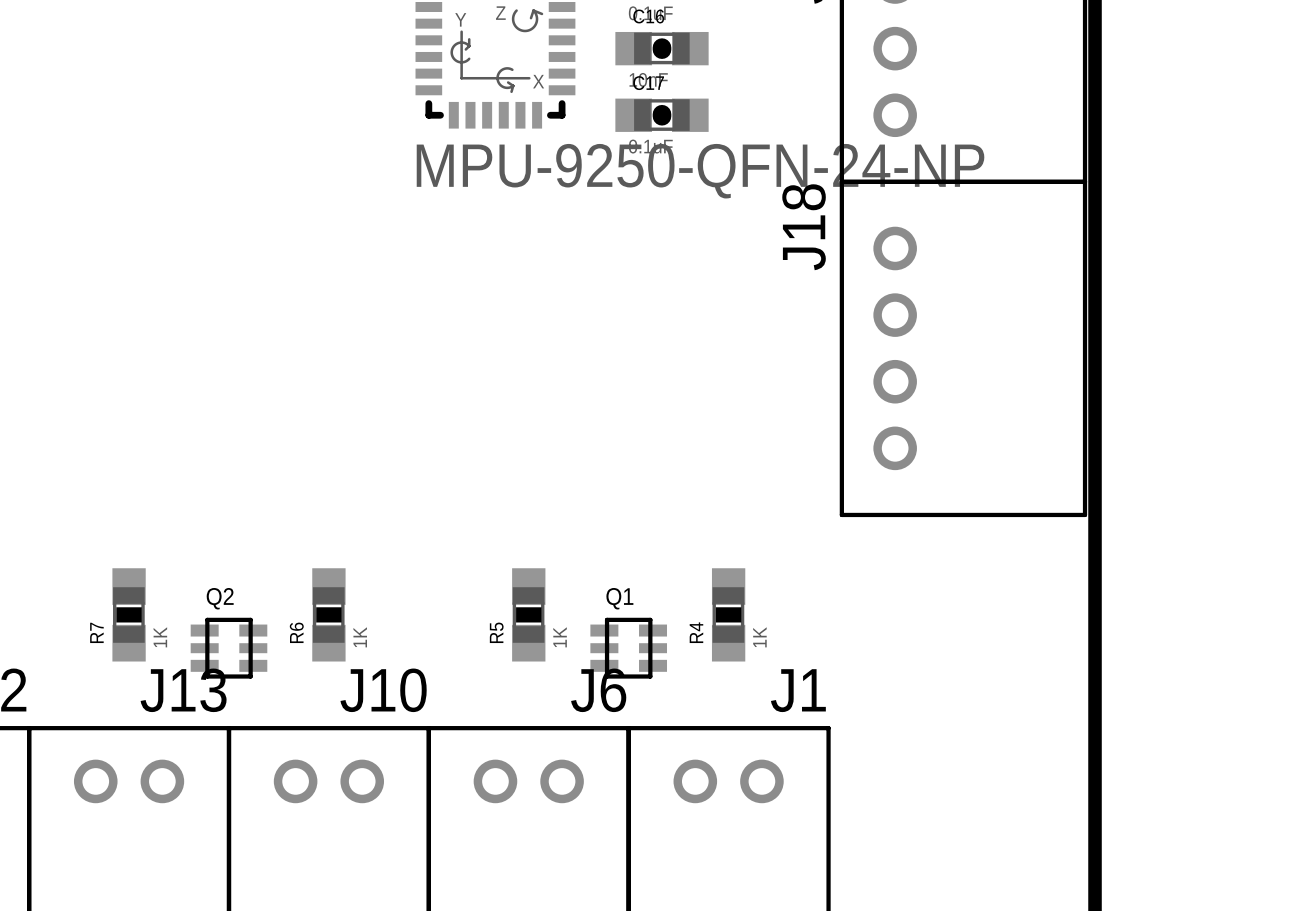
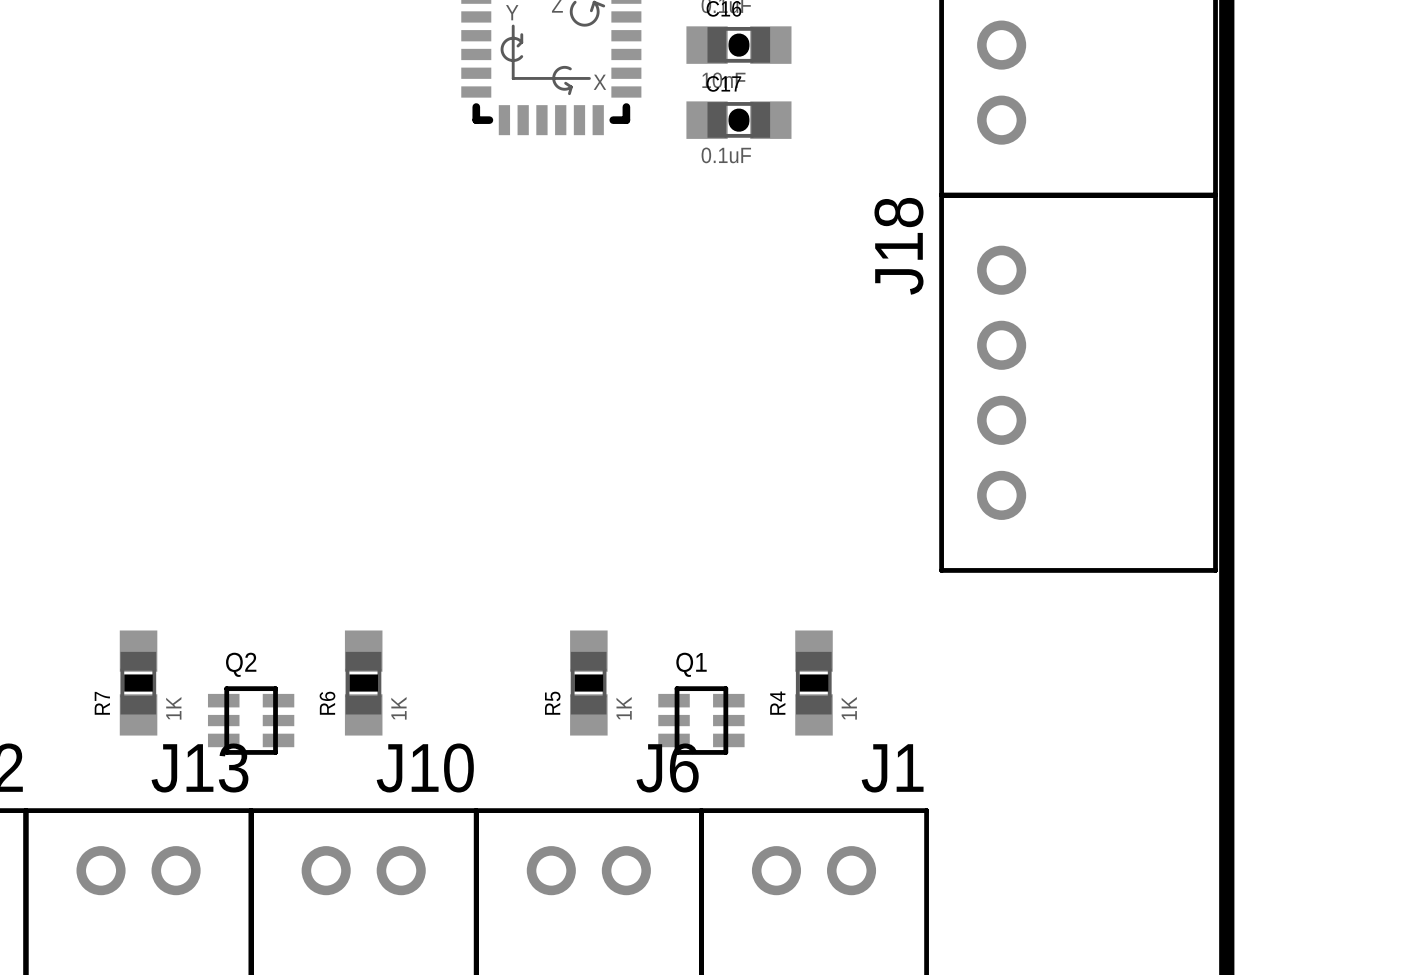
part value: MPU-9250-QFN-24-NP (700, 171) -> none

